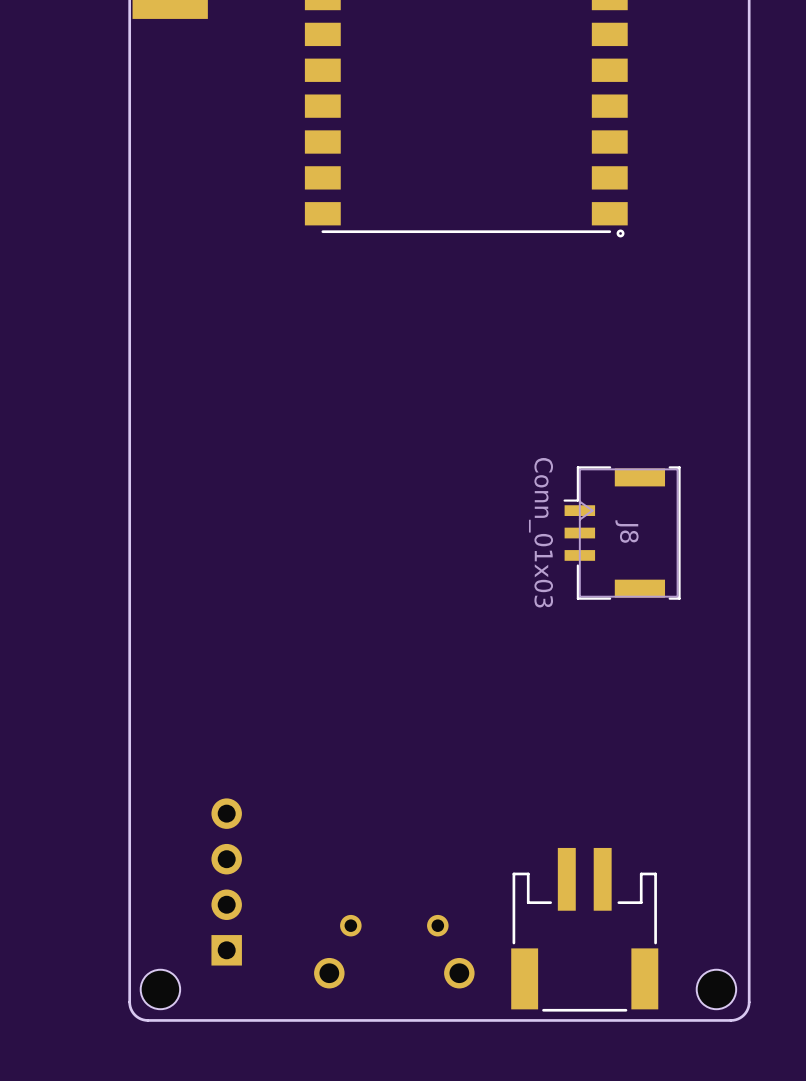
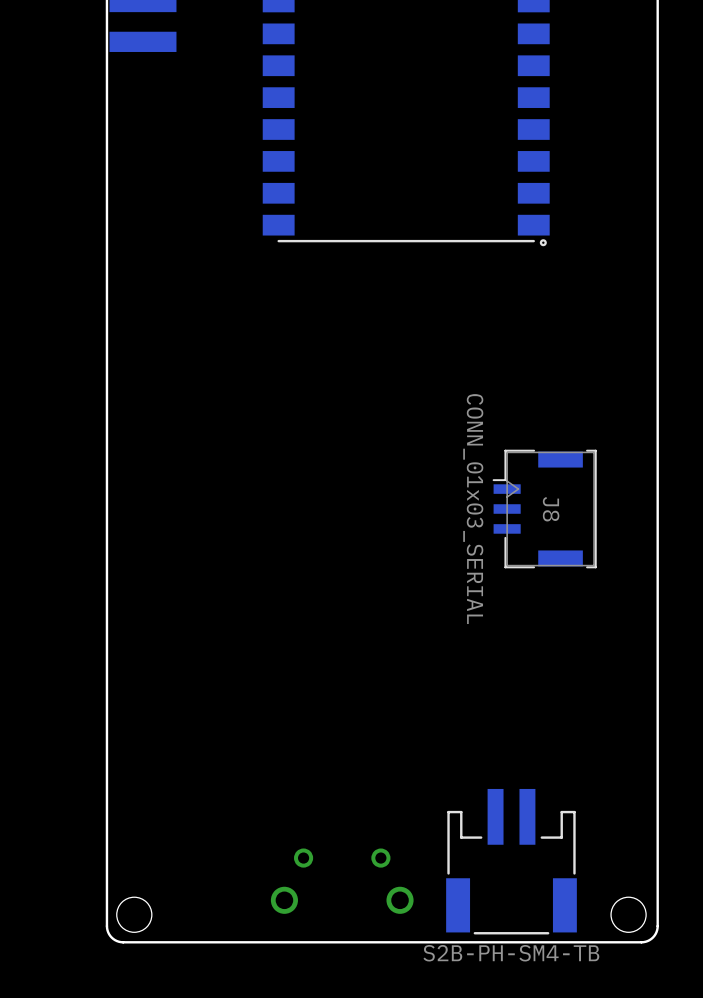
J8 value: Conn_01x03 (541, 532) -> CONN_01x03_SERIAL (473, 509)
part: (226, 881) -> none
part value: none -> S2B-PH-SM4-TB (511, 953)

